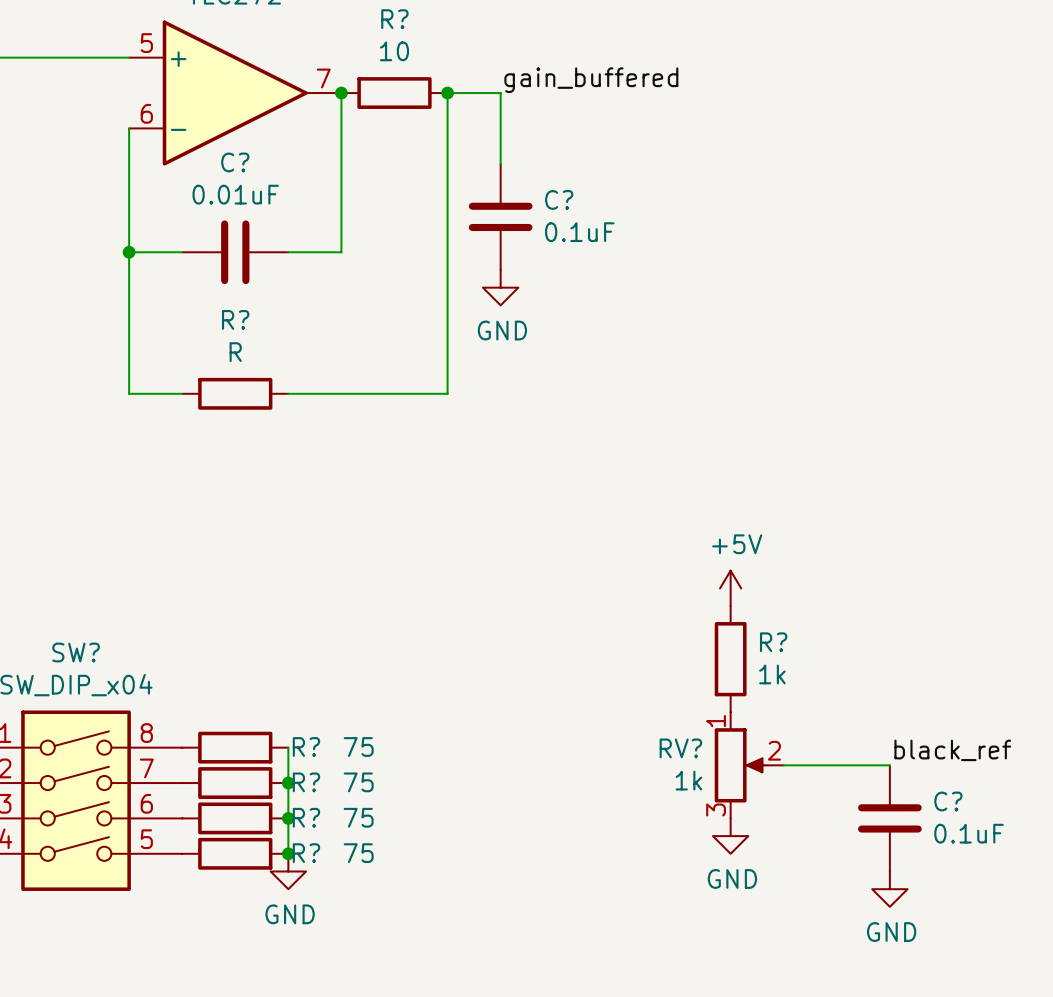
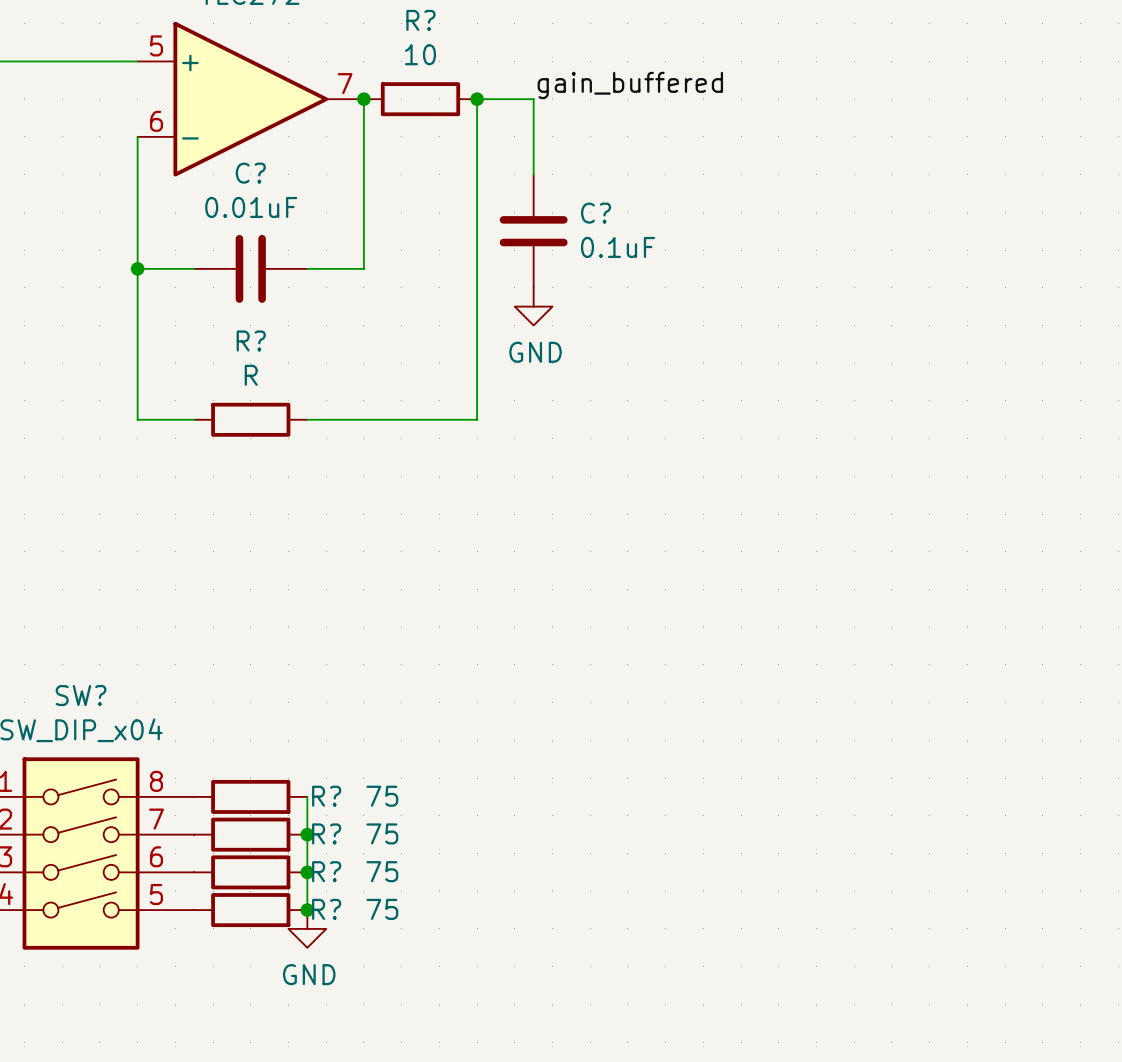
power symbol: +5V (730, 588) -> none
R?: 1k (730, 659) -> none
label: black_ref (952, 750) -> none
RV?: 1k (749, 765) -> none
wire: (783, 765) (889, 765) -> none
C?: 0.1uF (889, 818) -> none
power symbol: GND (730, 836) -> none
power symbol: GND (889, 889) -> none

